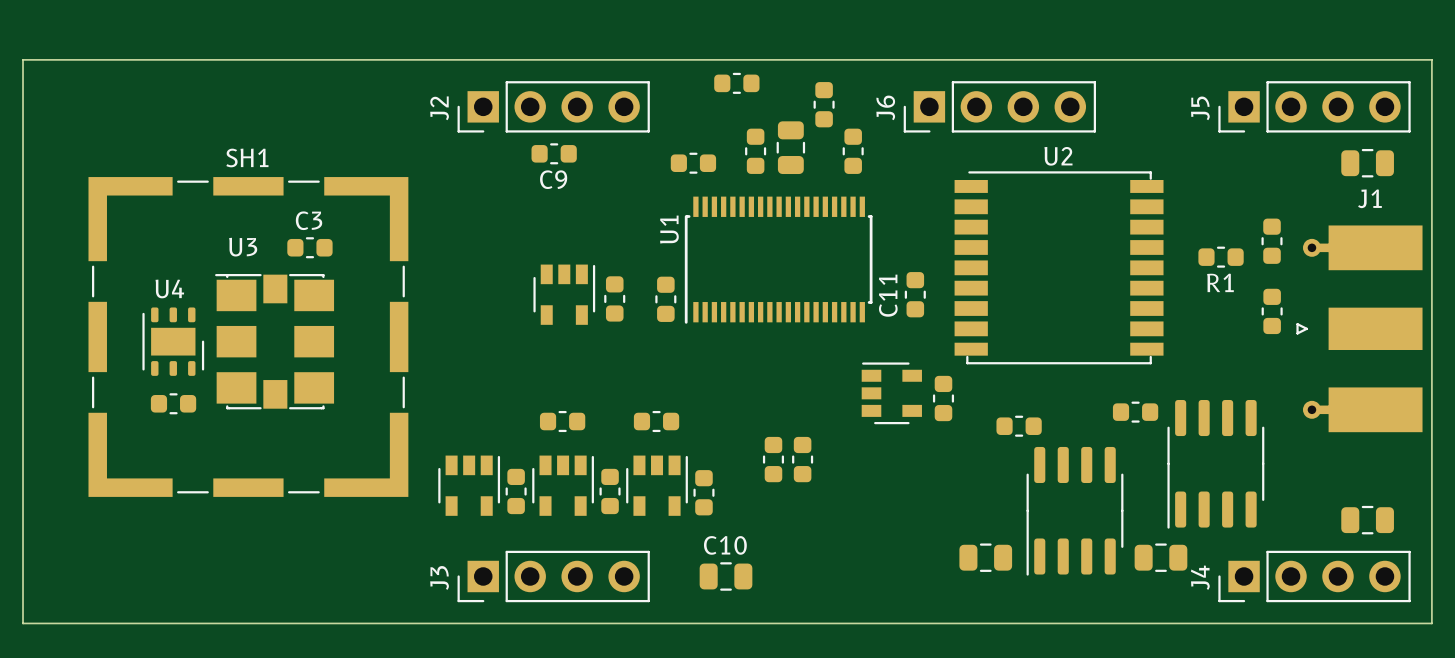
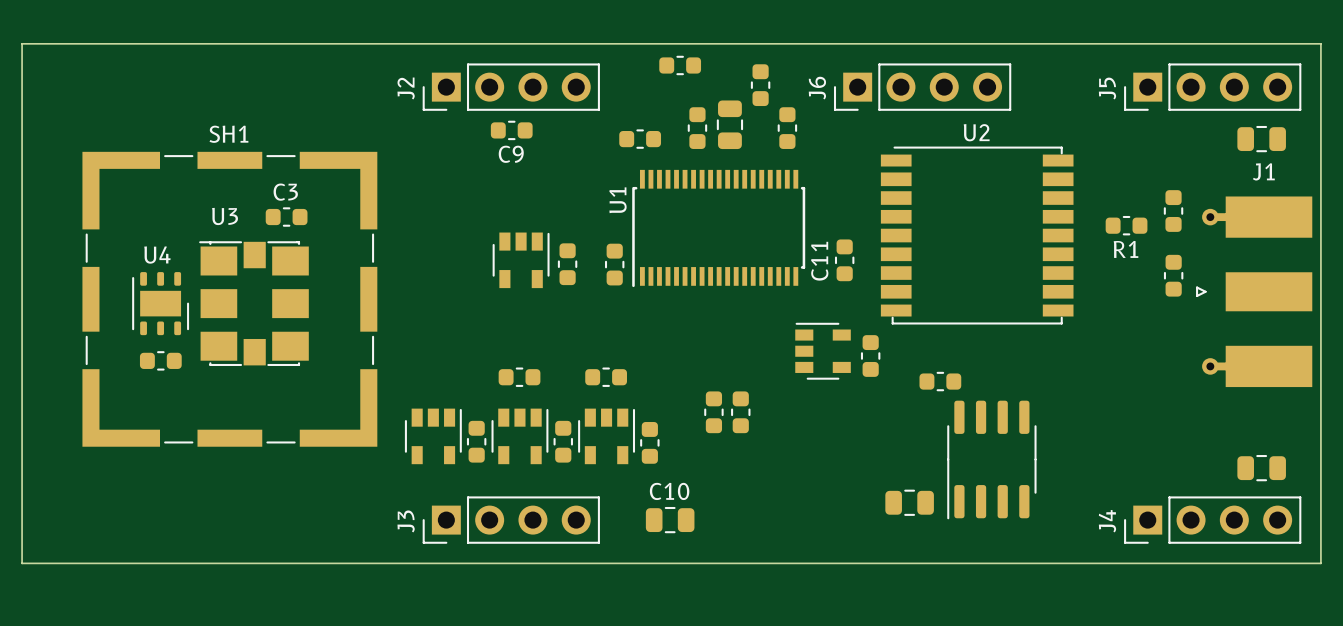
part: (1135, 412) -> none
part: (1215, 464) -> none
part: (1160, 557) -> none

